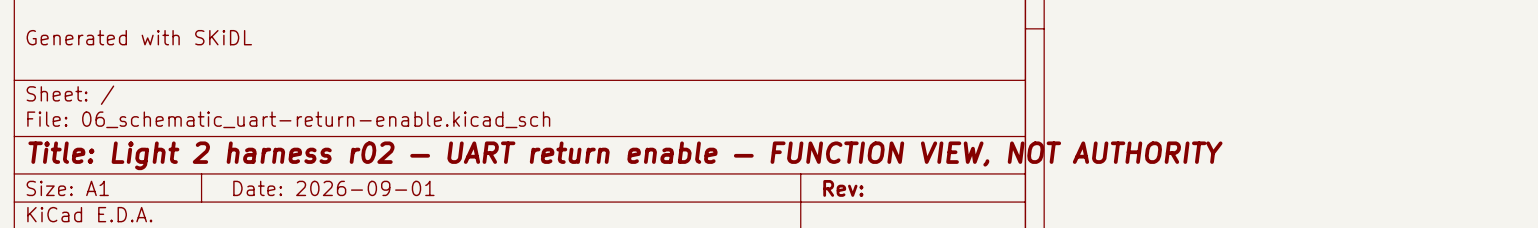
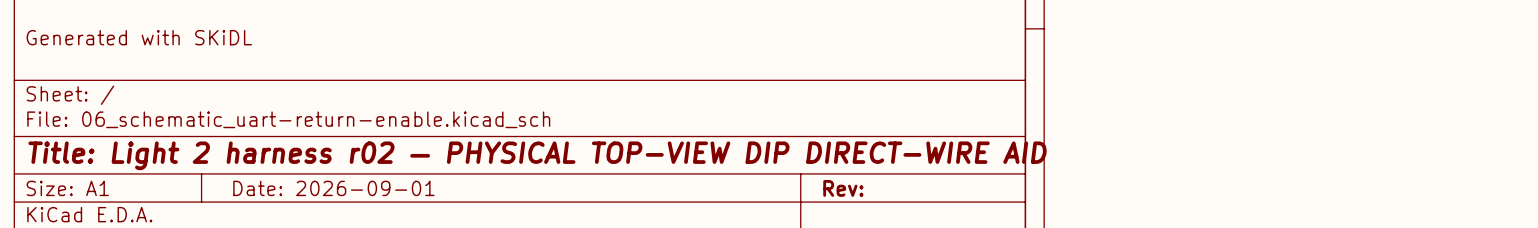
title block: Title: Light 2 harness r02 — UART return enable — FUNCTION VIEW, NOT AUTHORITY (625, 155) -> Title: Light 2 harness r02 — PHYSICAL TOP-VIEW DIP DIRECT-WIRE AID (537, 155)

